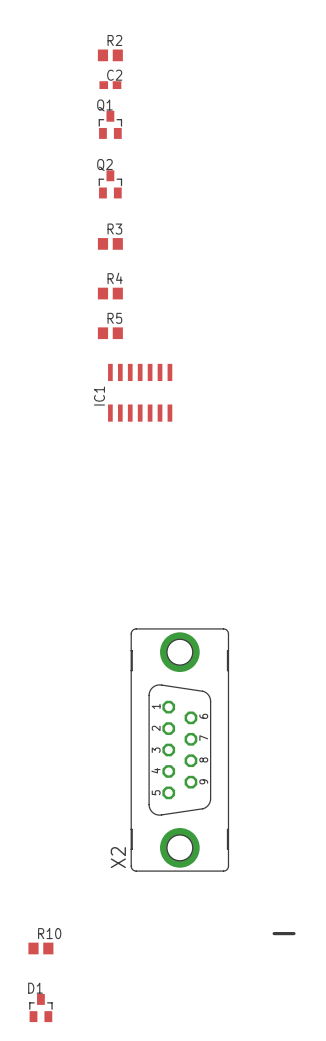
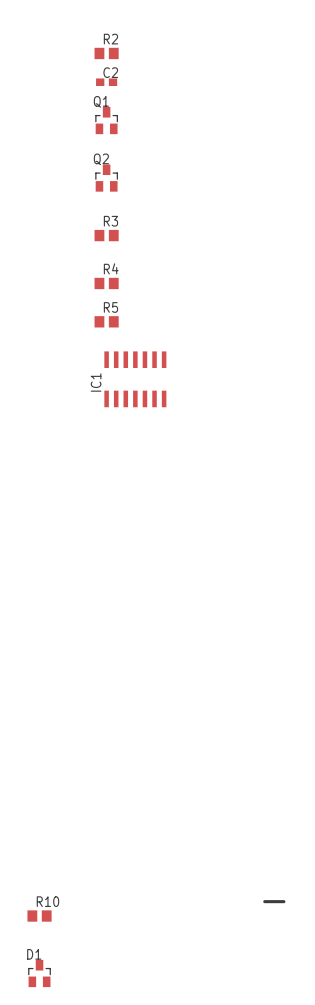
X2: (179, 750) -> none

